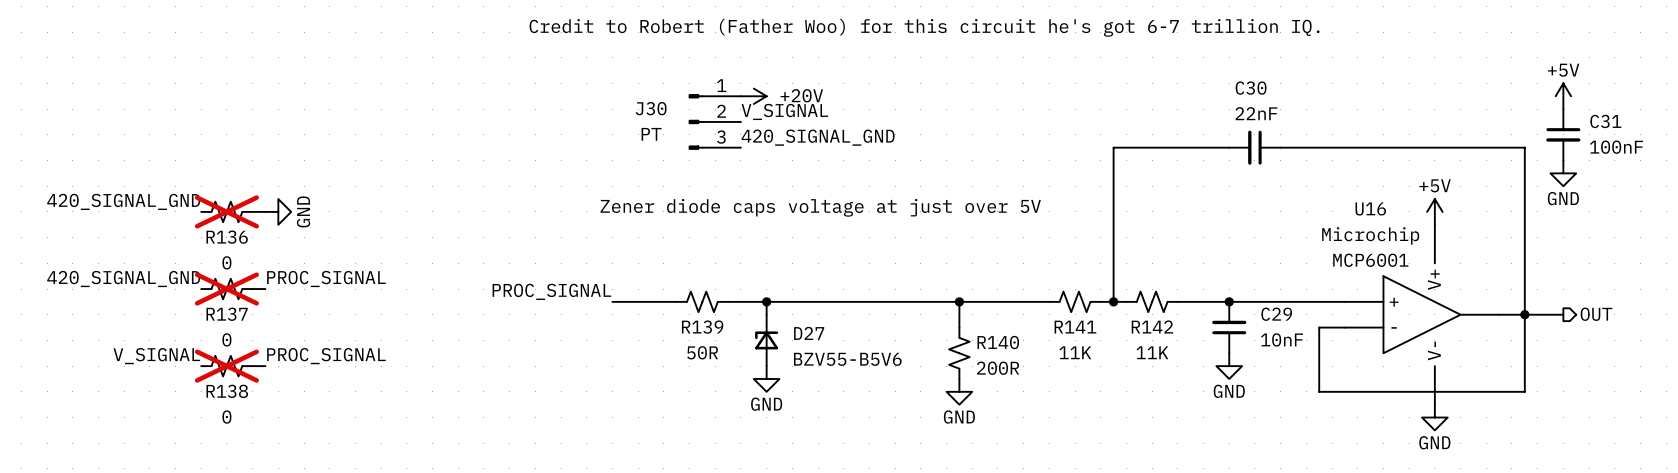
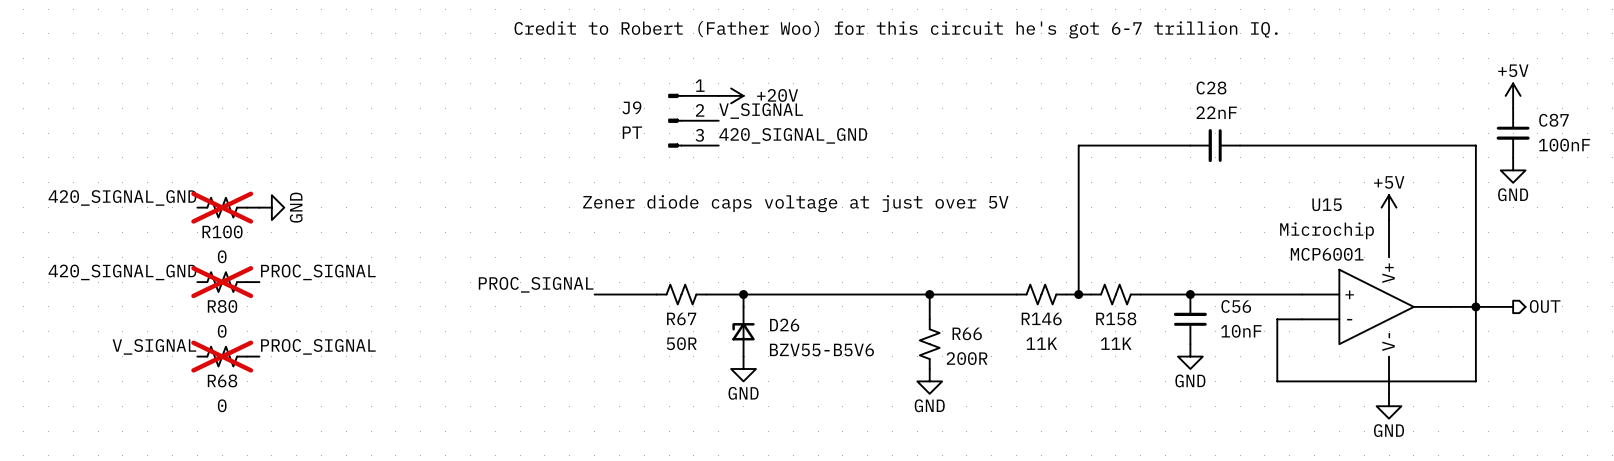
C30 name: C30 (1251, 88) -> C28 (1211, 88)
J30 name: J30 (651, 108) -> J9 (631, 107)
C31 name: C31 (1605, 121) -> C87 (1553, 120)
U16 name: U16 (1370, 208) -> U15 (1327, 204)
R136 name: R136 (227, 237) -> R100 (222, 231)
R137 name: R137 (227, 314) -> R80 (222, 306)
C29 name: C29 (1276, 314) -> C56 (1236, 306)
R142 name: R142 (1152, 326) -> R158 (1116, 318)
R139 name: R139 (702, 327) -> R67 (681, 318)
R141 name: R141 (1075, 327) -> R146 (1041, 318)
D27 name: D27 (809, 333) -> D26 (784, 325)
R140 name: R140 (998, 342) -> R66 (967, 333)
R138 name: R138 (227, 391) -> R68 (222, 380)

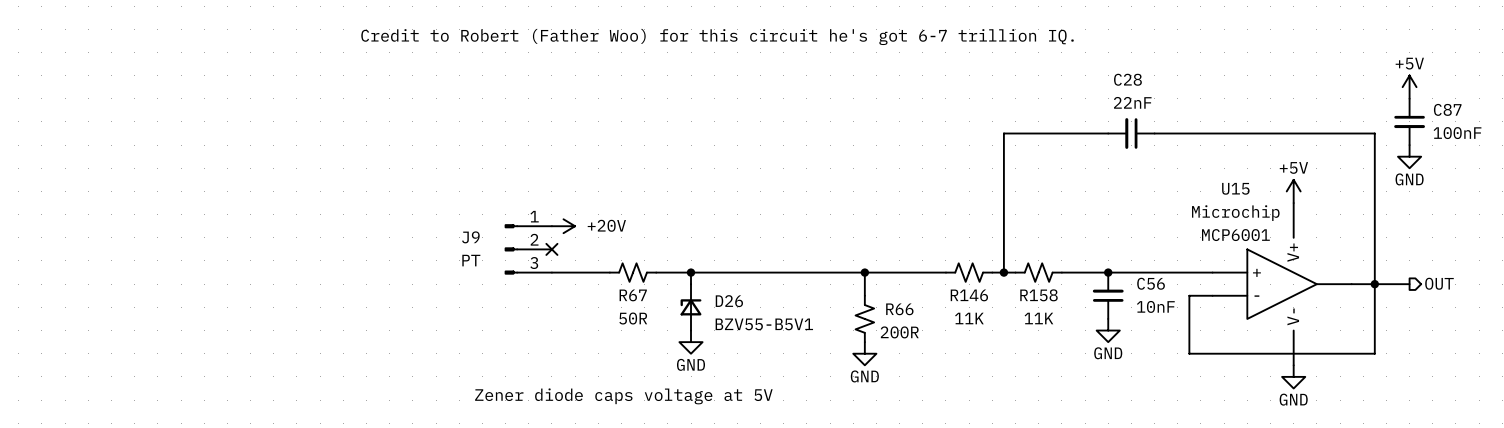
text position: Credit to Robert (Father Woo) for this circuit he's got 6-7 trillion IQ. (896, 29) -> Credit to Robert (Father Woo) for this circuit he's got 6-7 trillion IQ. (717, 37)
power symbol position: +20V (731, 95) -> +20V (563, 226)
label: V_SIGNAL (761, 111) -> none
J9 position: (693, 120) -> (528, 249)
label: 420_SIGNAL_GND (793, 135) -> none
label: 420_SIGNAL_GND (122, 197) -> none
text: Zener diode caps voltage at just over 5V (795, 203) -> none
R100: 0 (222, 207) -> none
wire: (247, 207) (259, 207) -> none
power symbol: GND (271, 207) -> none
no-connect mark: none -> (551, 249)
label: 420_SIGNAL_GND (122, 272) -> none
label: PROC_SIGNAL (318, 272) -> none
R80: 0 (222, 282) -> none
wire: (247, 282) (259, 282) -> none
label: PROC_SIGNAL (536, 284) -> none
label: V_SIGNAL (154, 346) -> none
label: PROC_SIGNAL (318, 346) -> none
D26 value: BZV55-B5V6 (821, 350) -> BZV55-B5V1 (764, 324)
R68: 0 (222, 356) -> none
wire: (247, 356) (259, 356) -> none
text: none -> Zener diode caps voltage at 5V (623, 396)

